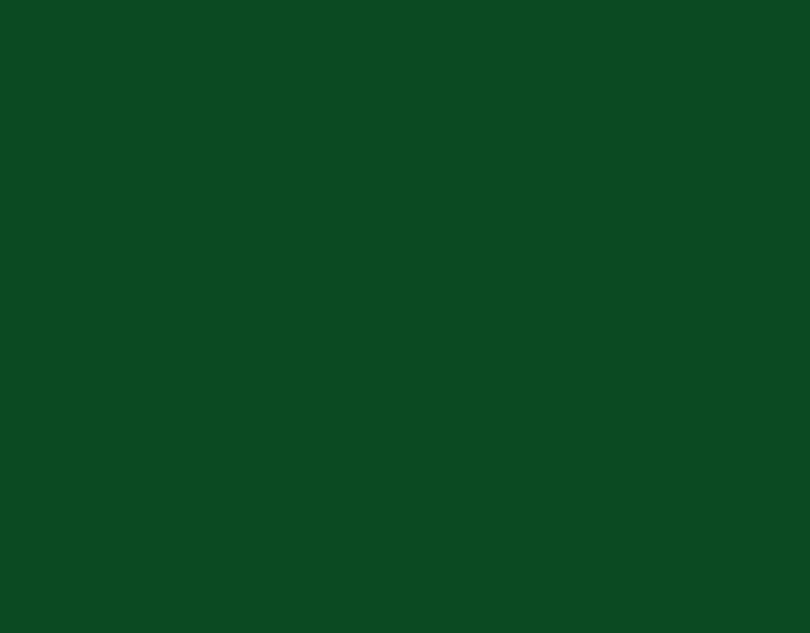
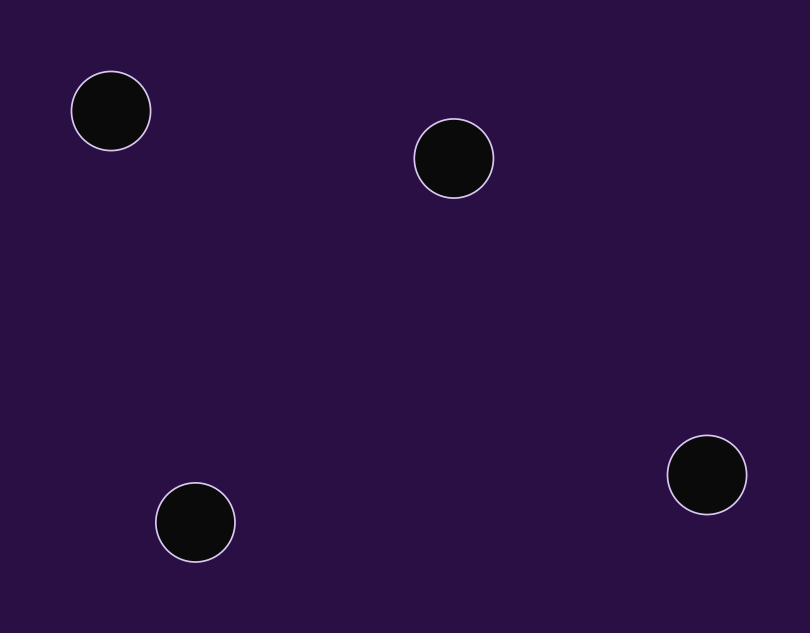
part: none -> (111, 111)
part: none -> (453, 158)
part: none -> (707, 474)
part: none -> (195, 522)

